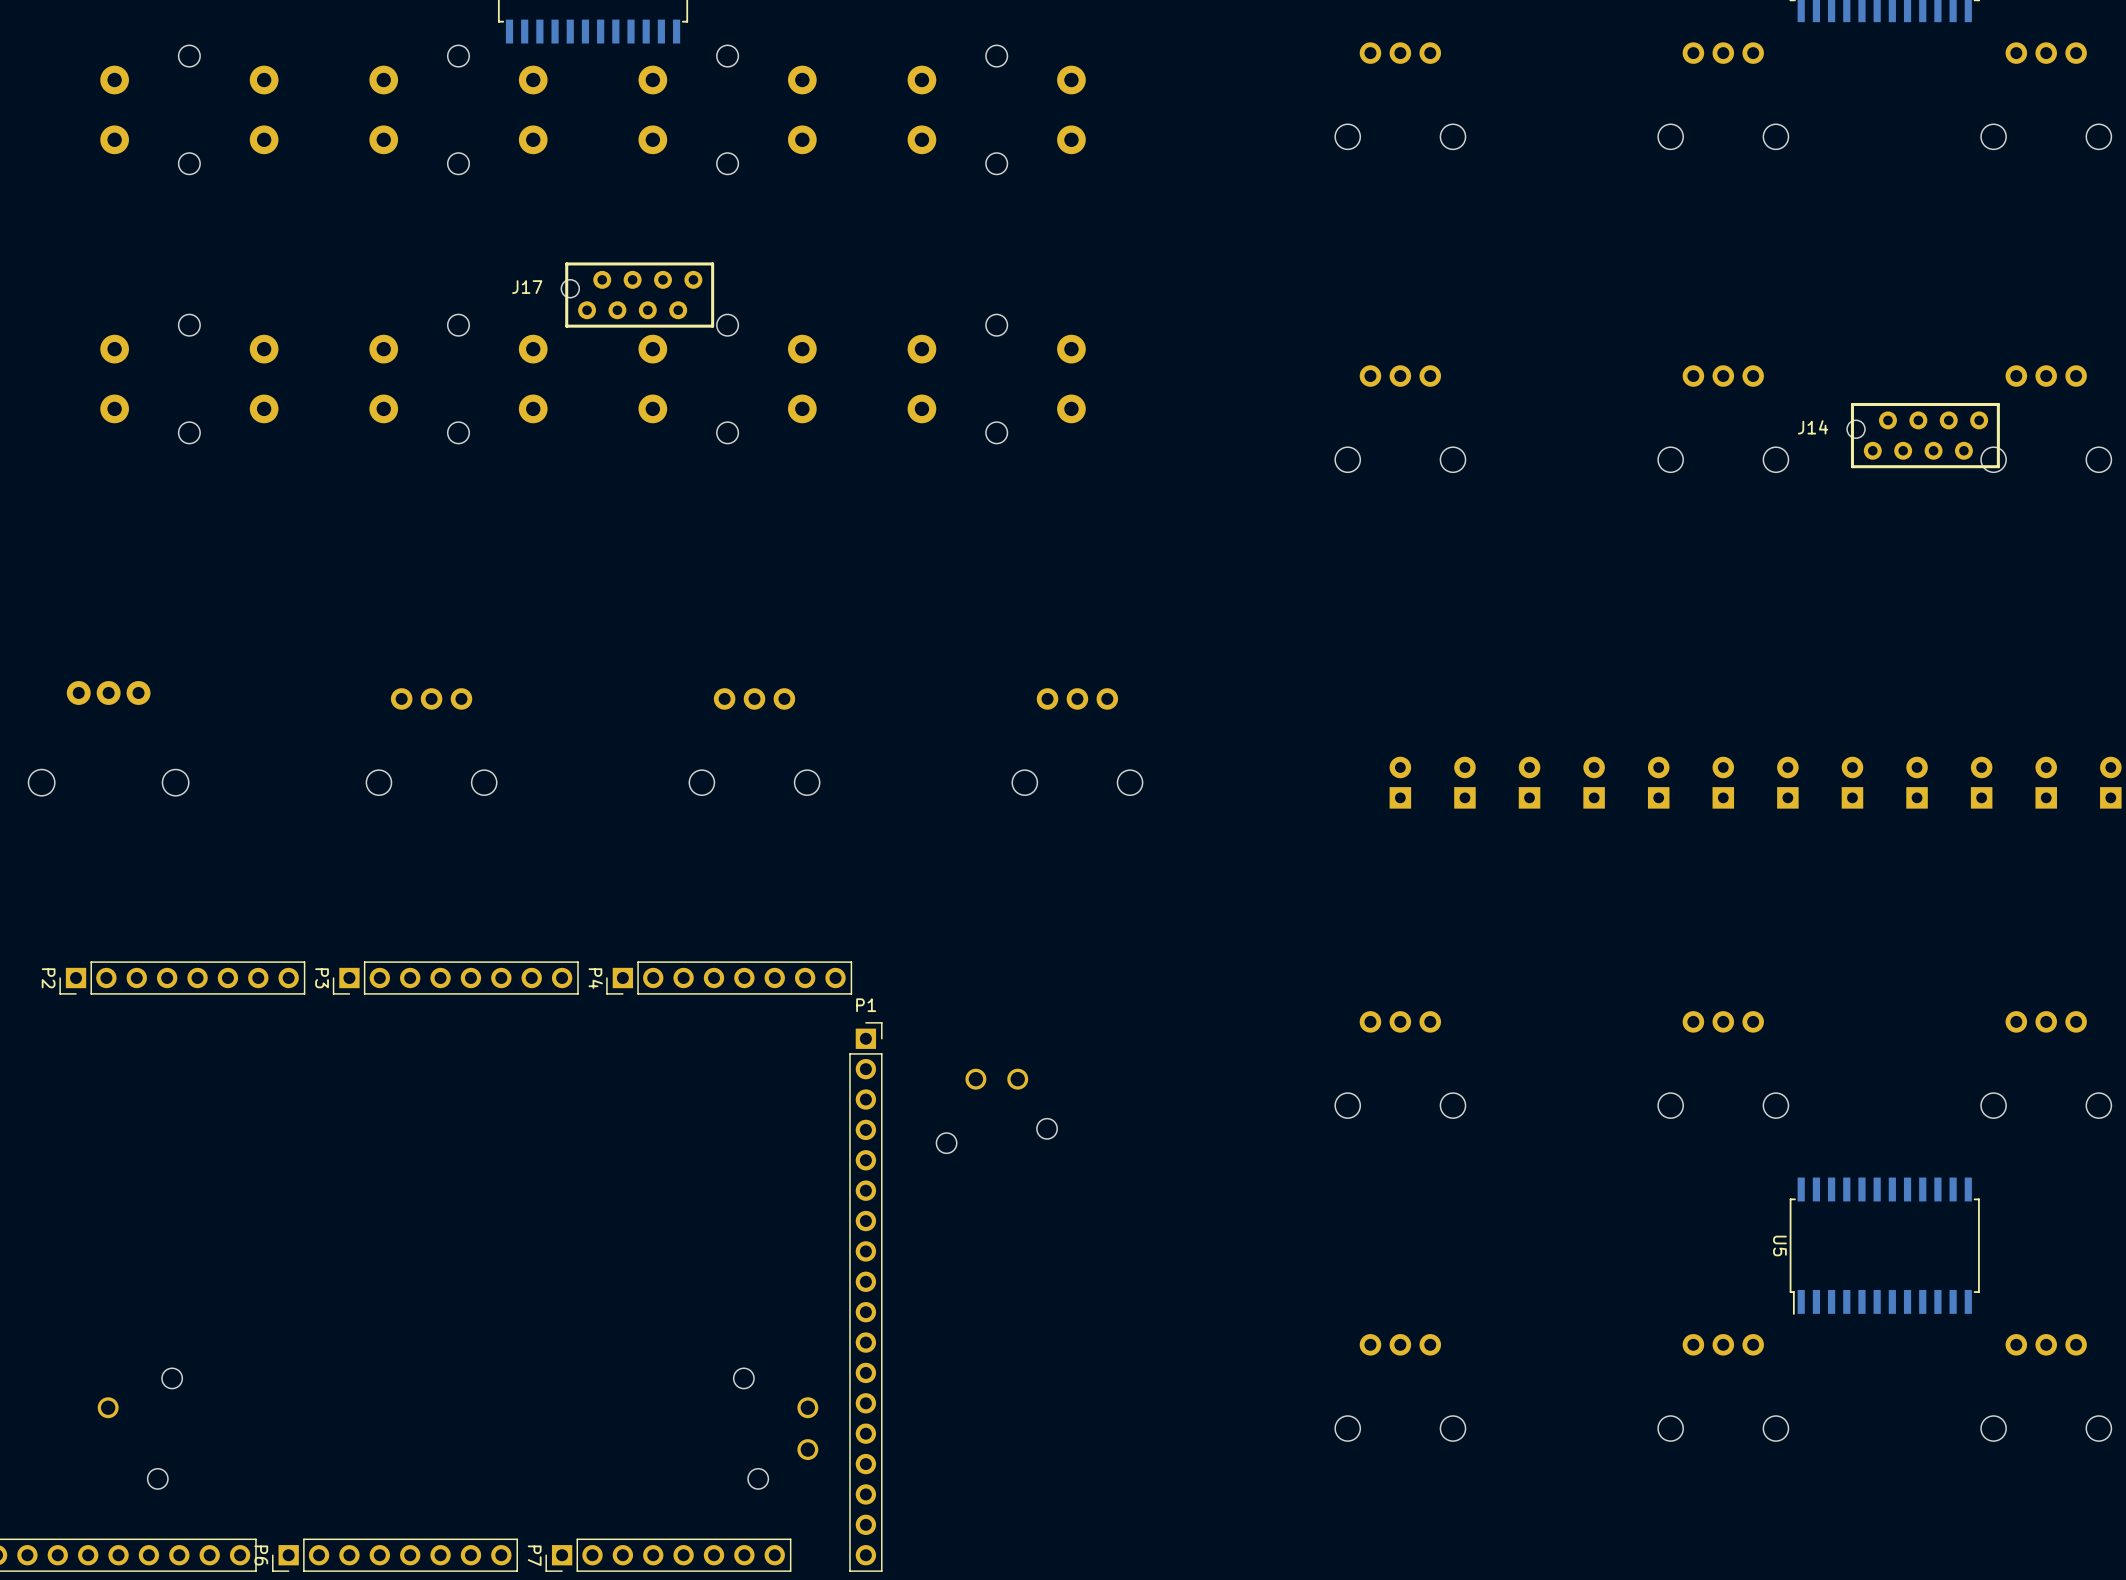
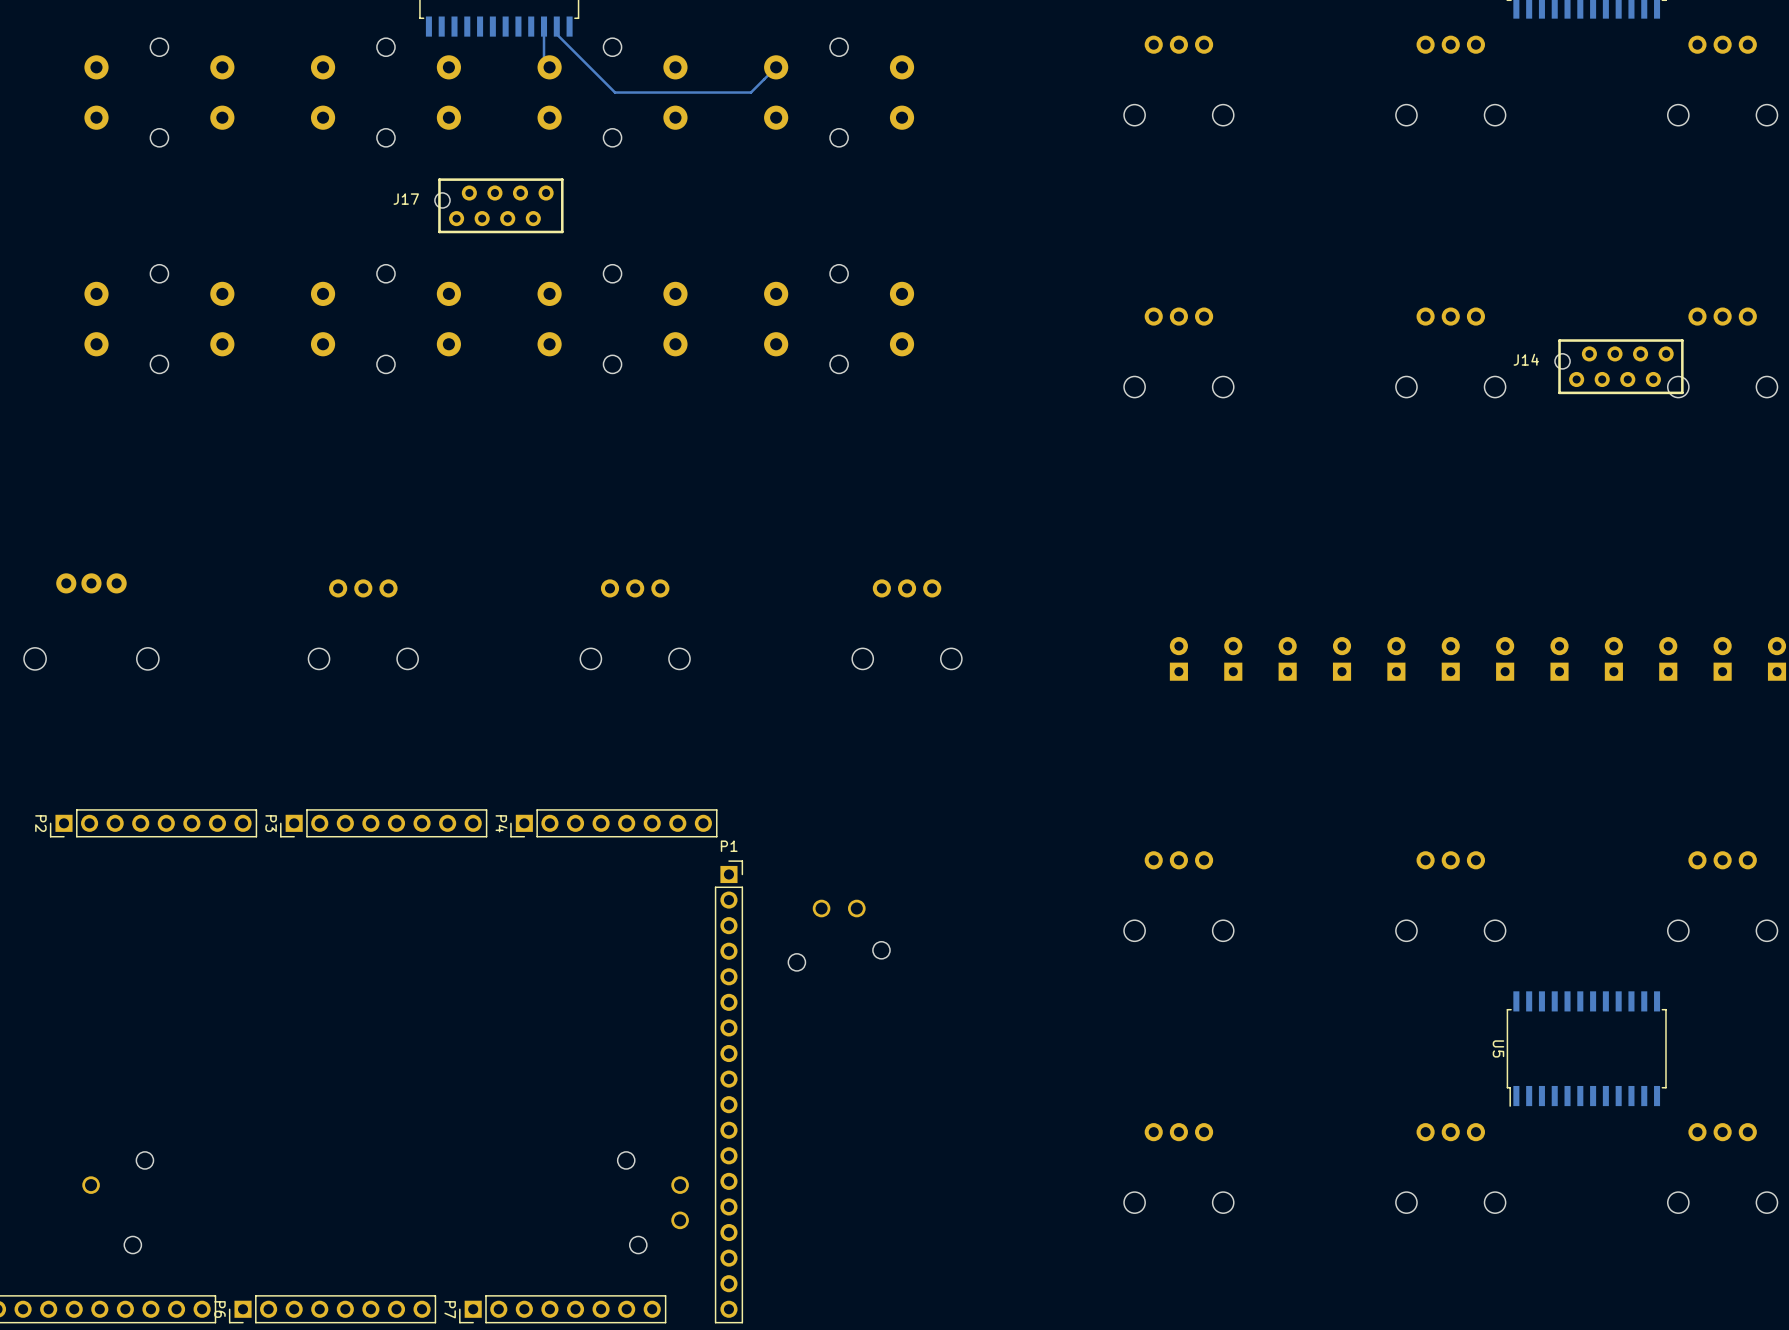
track: none -> (544, 26) (544, 61) (549, 67)
track: none -> (556, 26) (556, 34) (615, 92) (750, 92) (776, 67)
J17 position: (637, 295) -> (499, 205)

